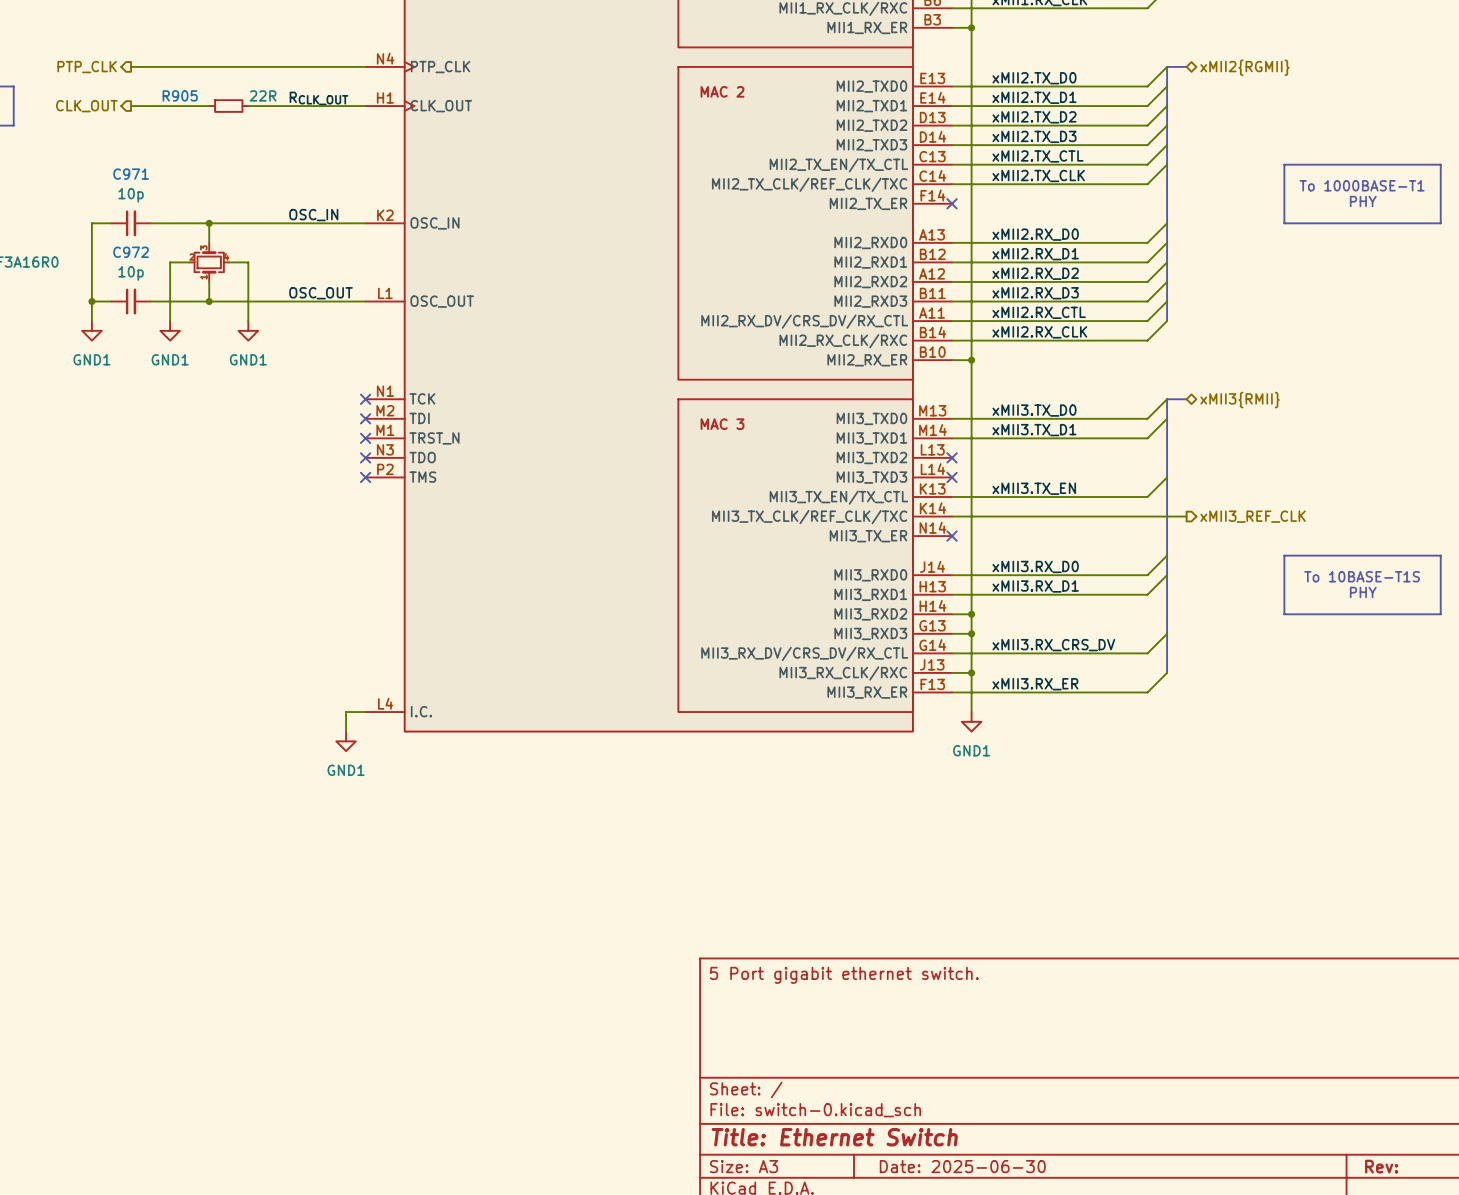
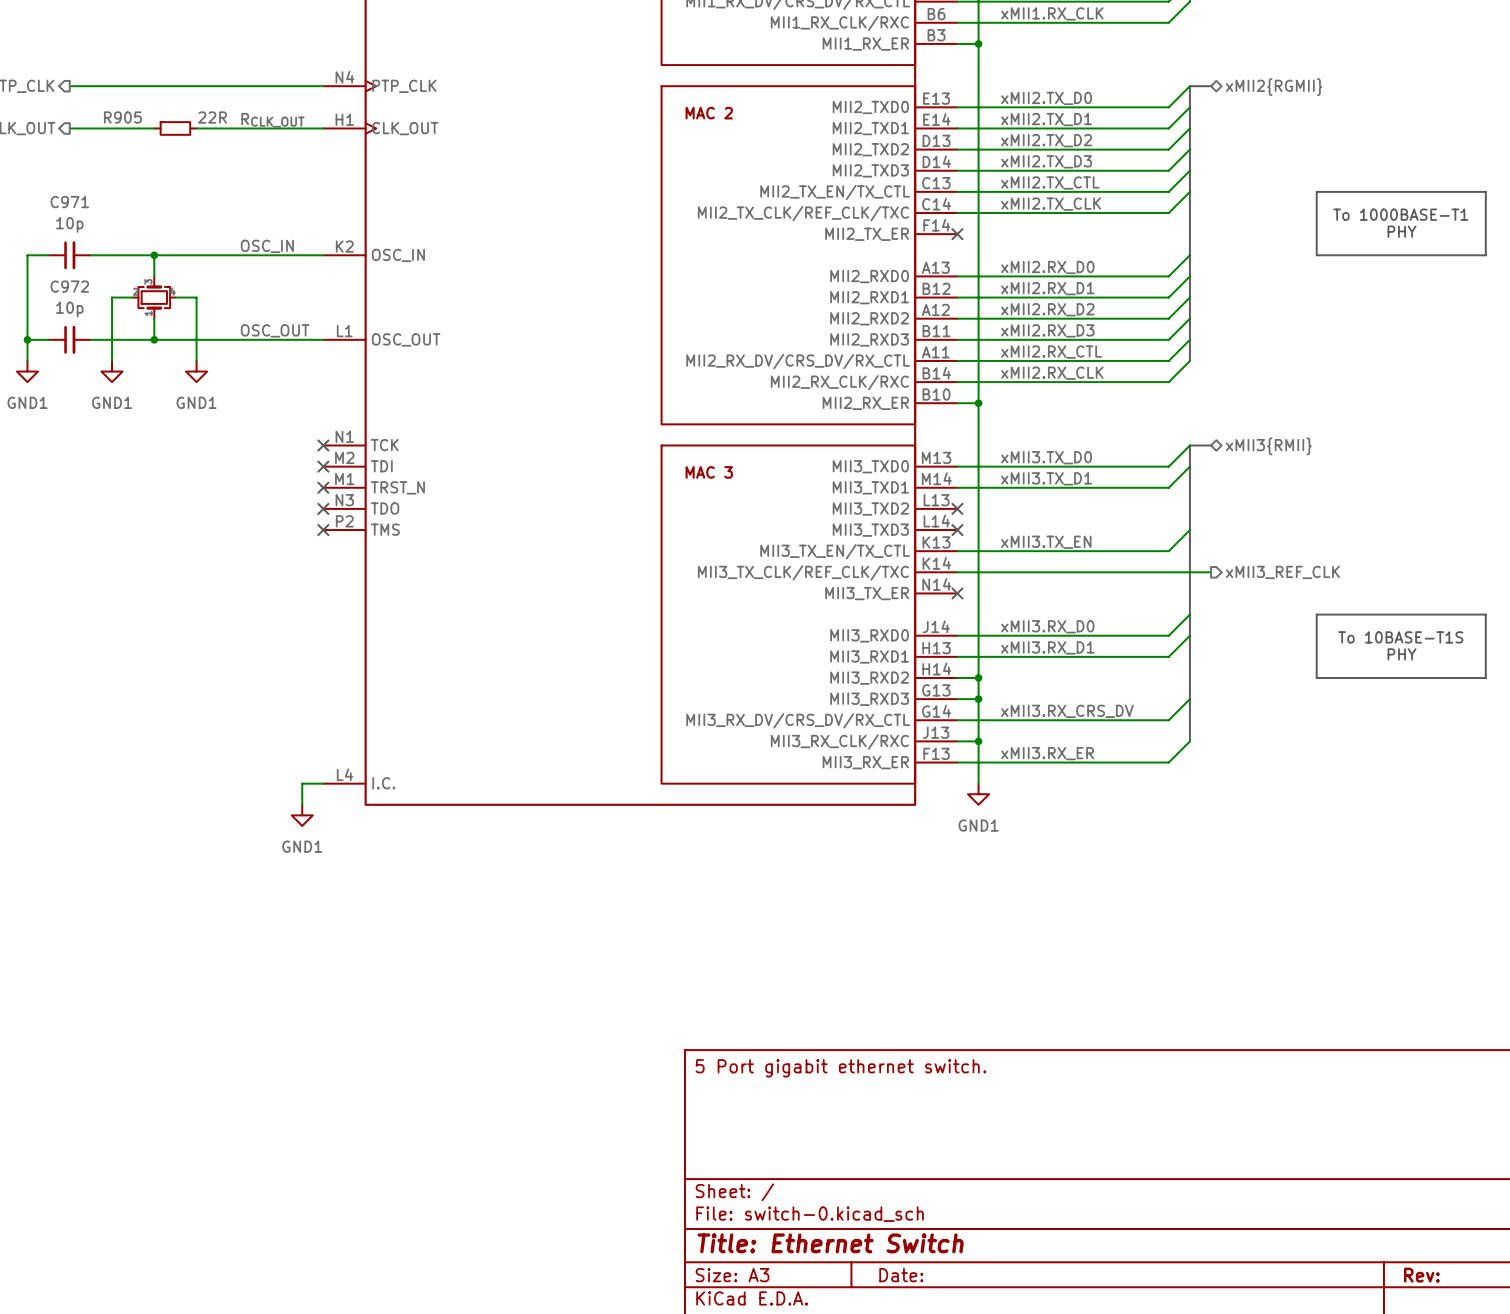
title block: Date: 2025-06-30 (962, 1166) -> Date: (901, 1275)

